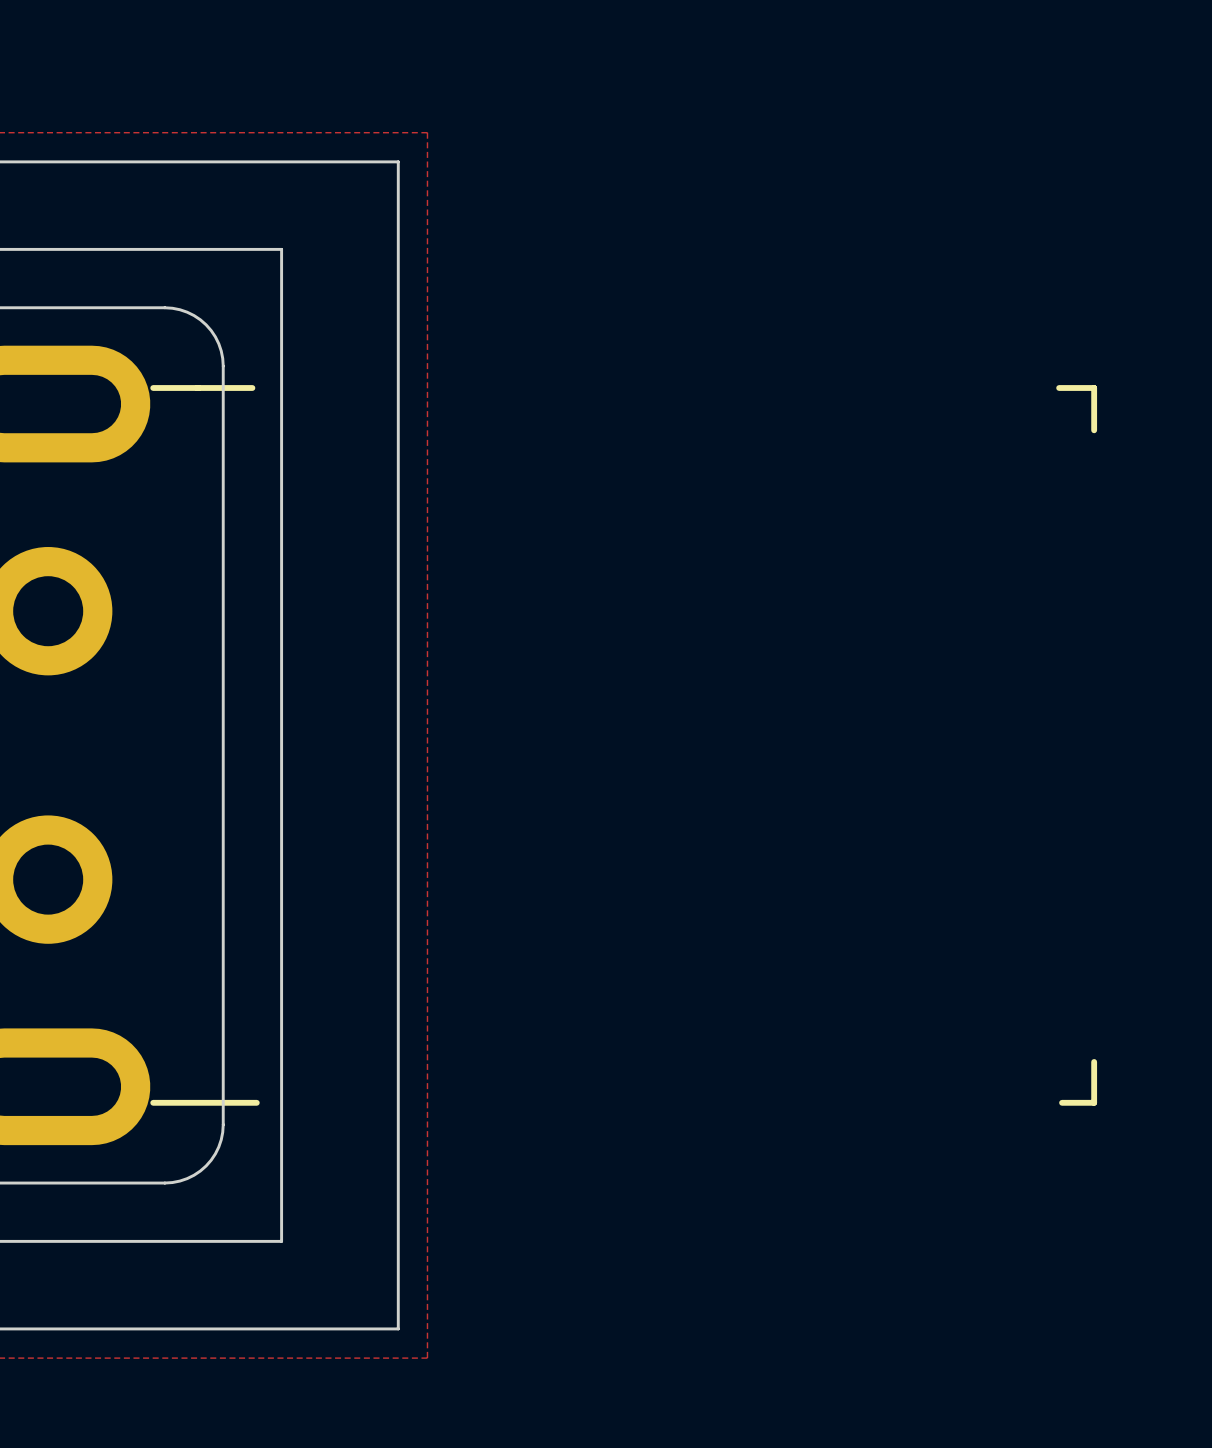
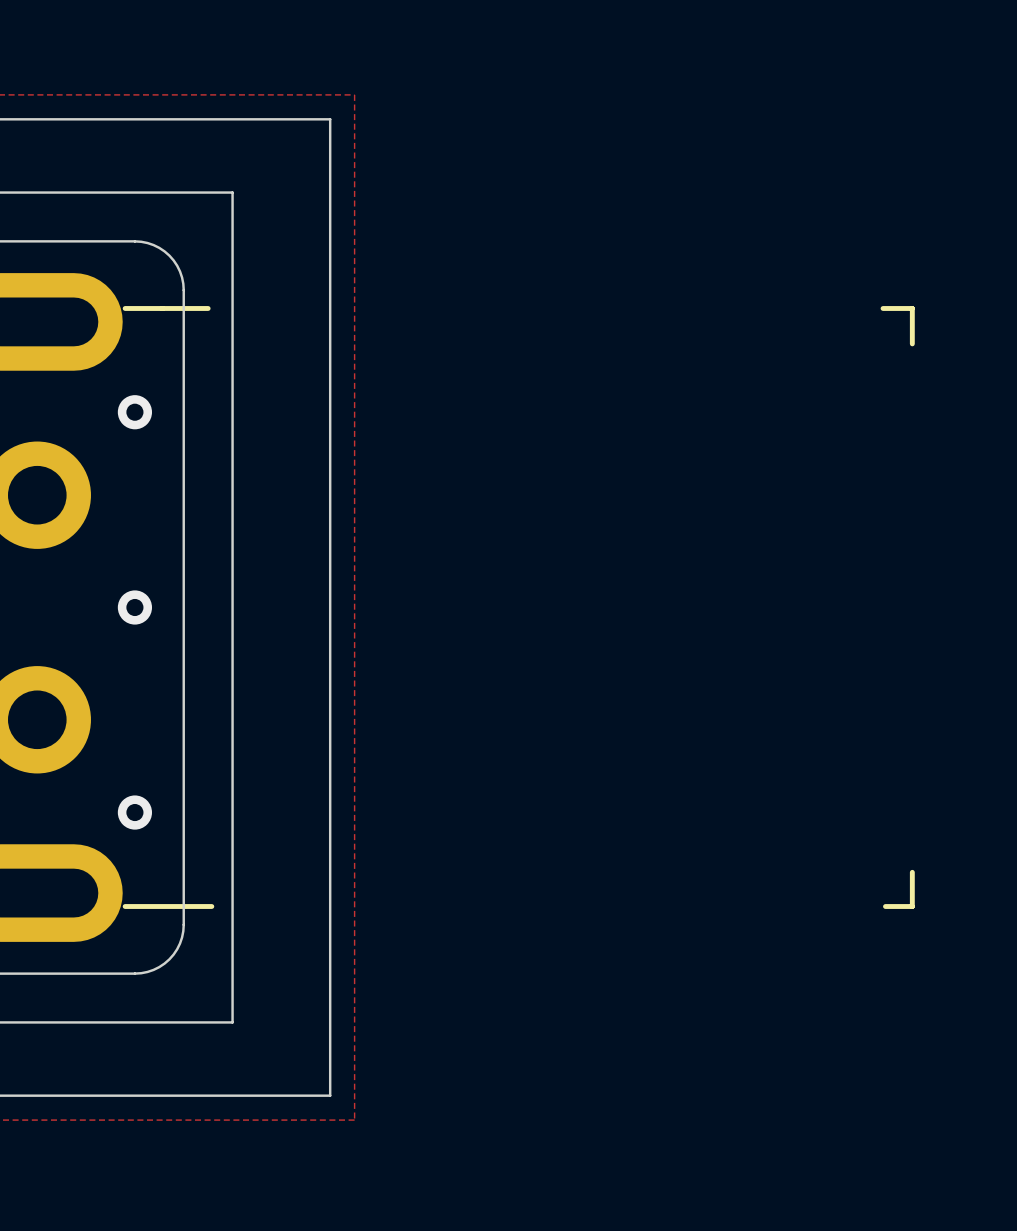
via: none -> (134, 412)
via: none -> (134, 607)
via: none -> (134, 812)

